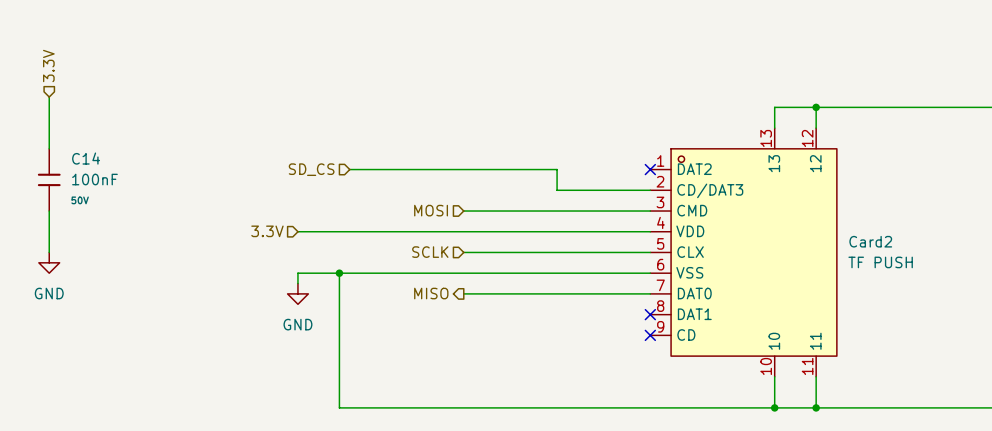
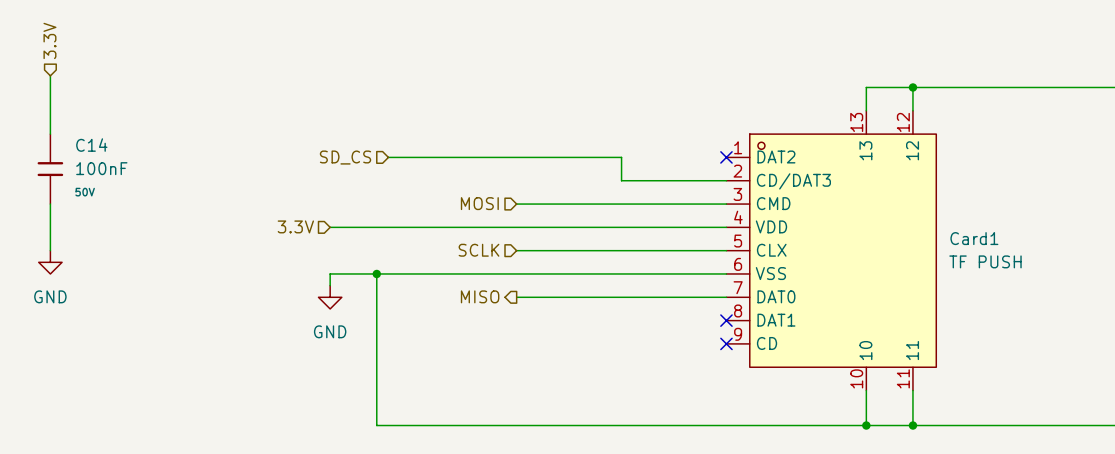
Card2 name: Card2 (870, 241) -> Card1 (974, 238)

